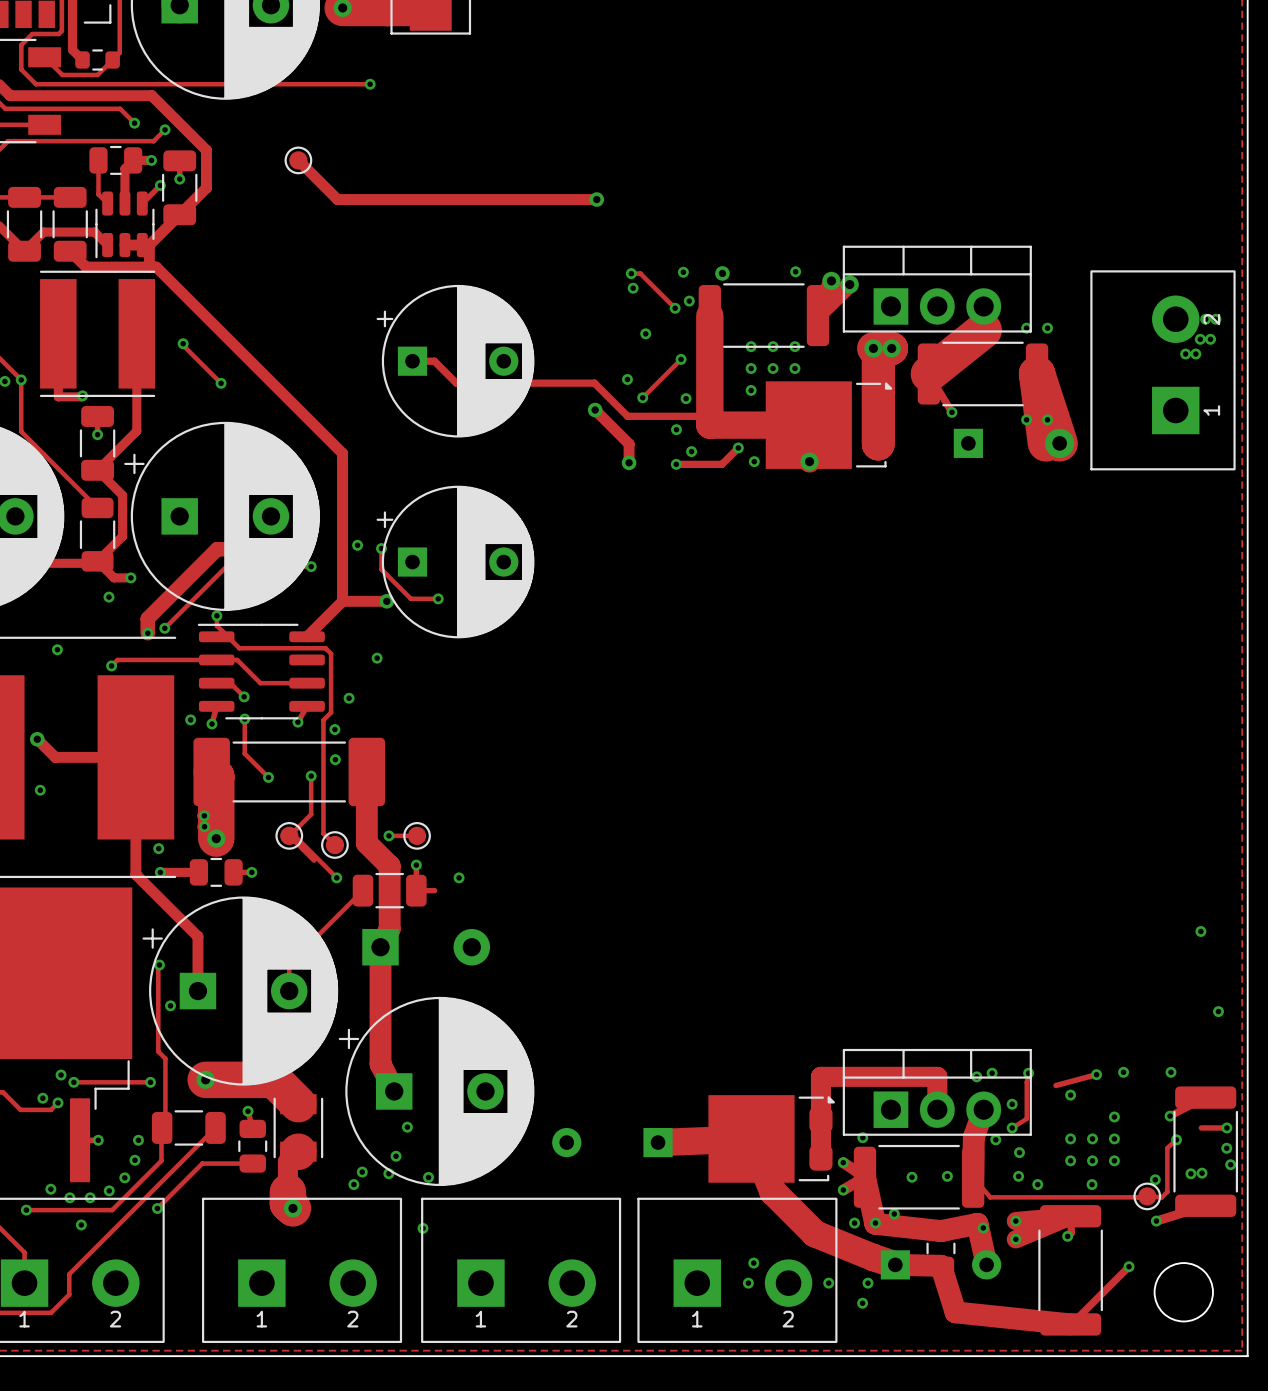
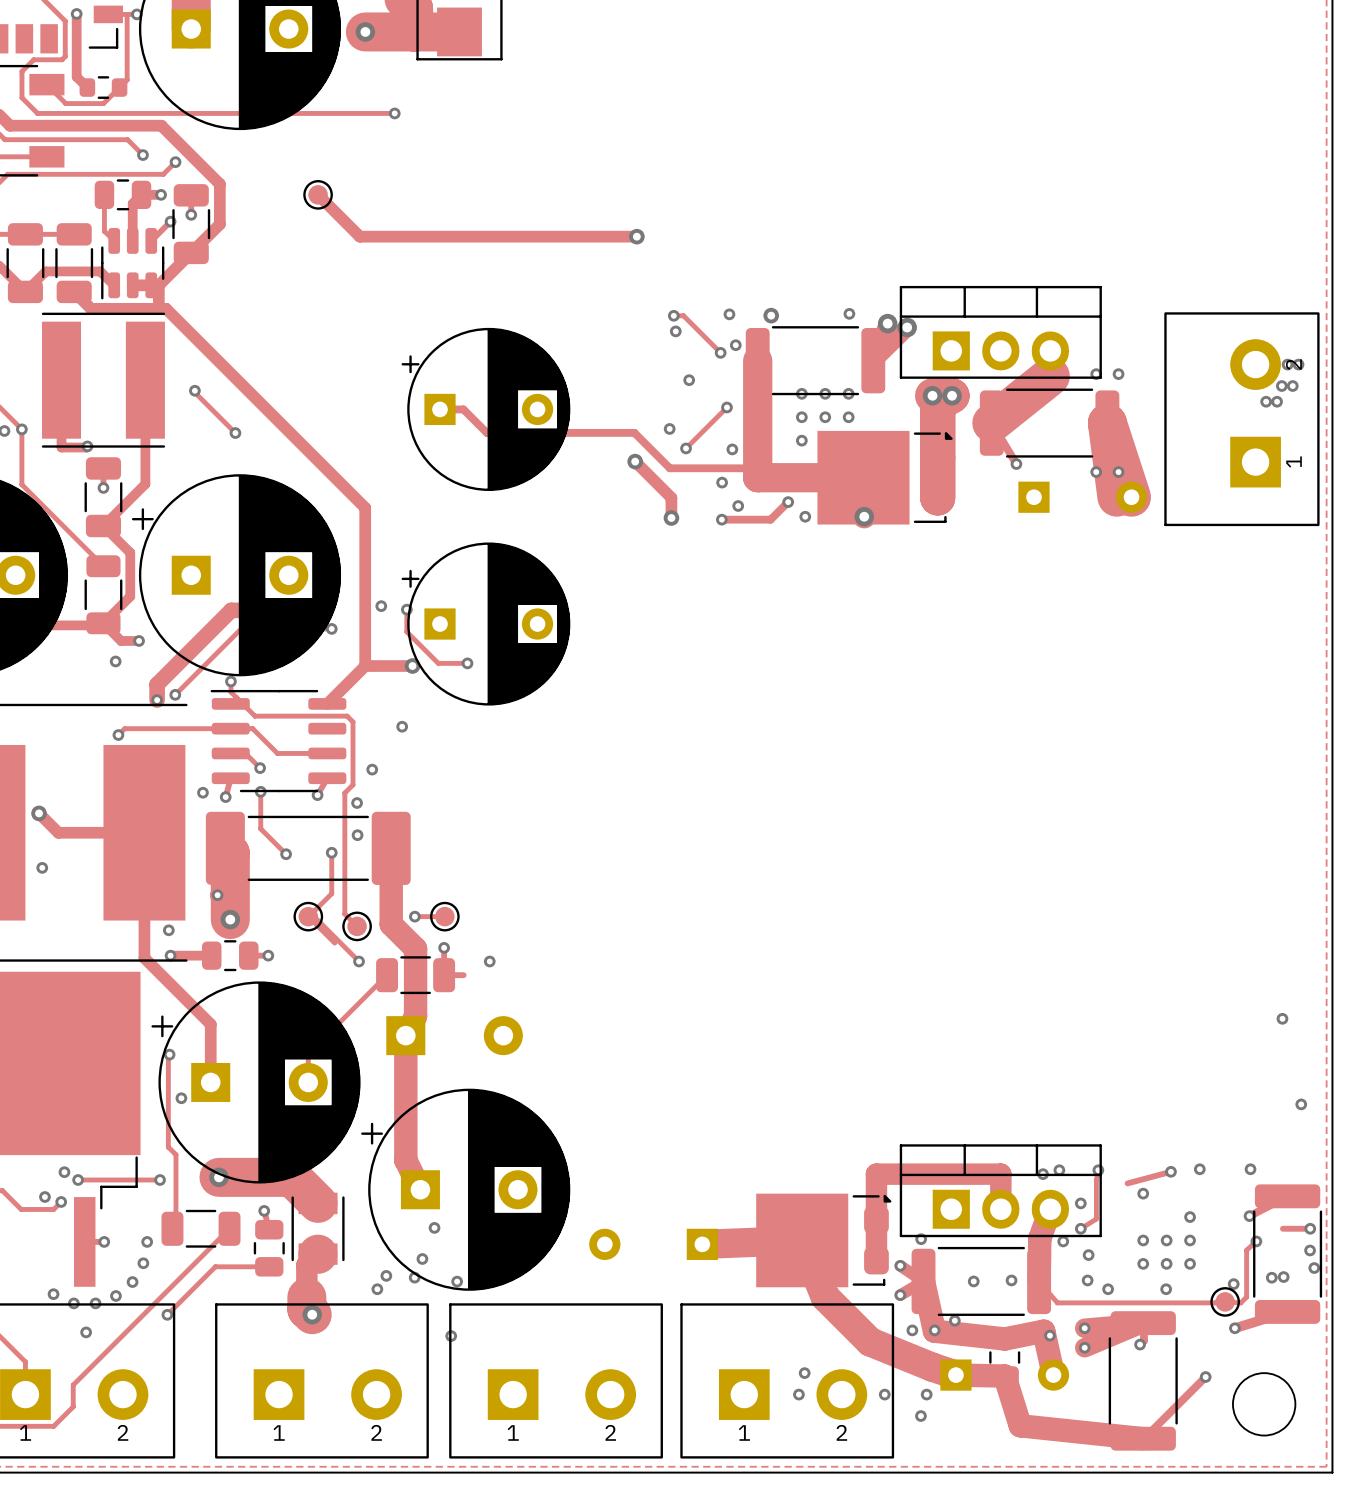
via: (57, 649) -> none
via: (204, 826) -> none
track: (162, 1127) (161, 1160) (112, 1210) (26, 1210) -> none
via: (26, 1210) -> none

